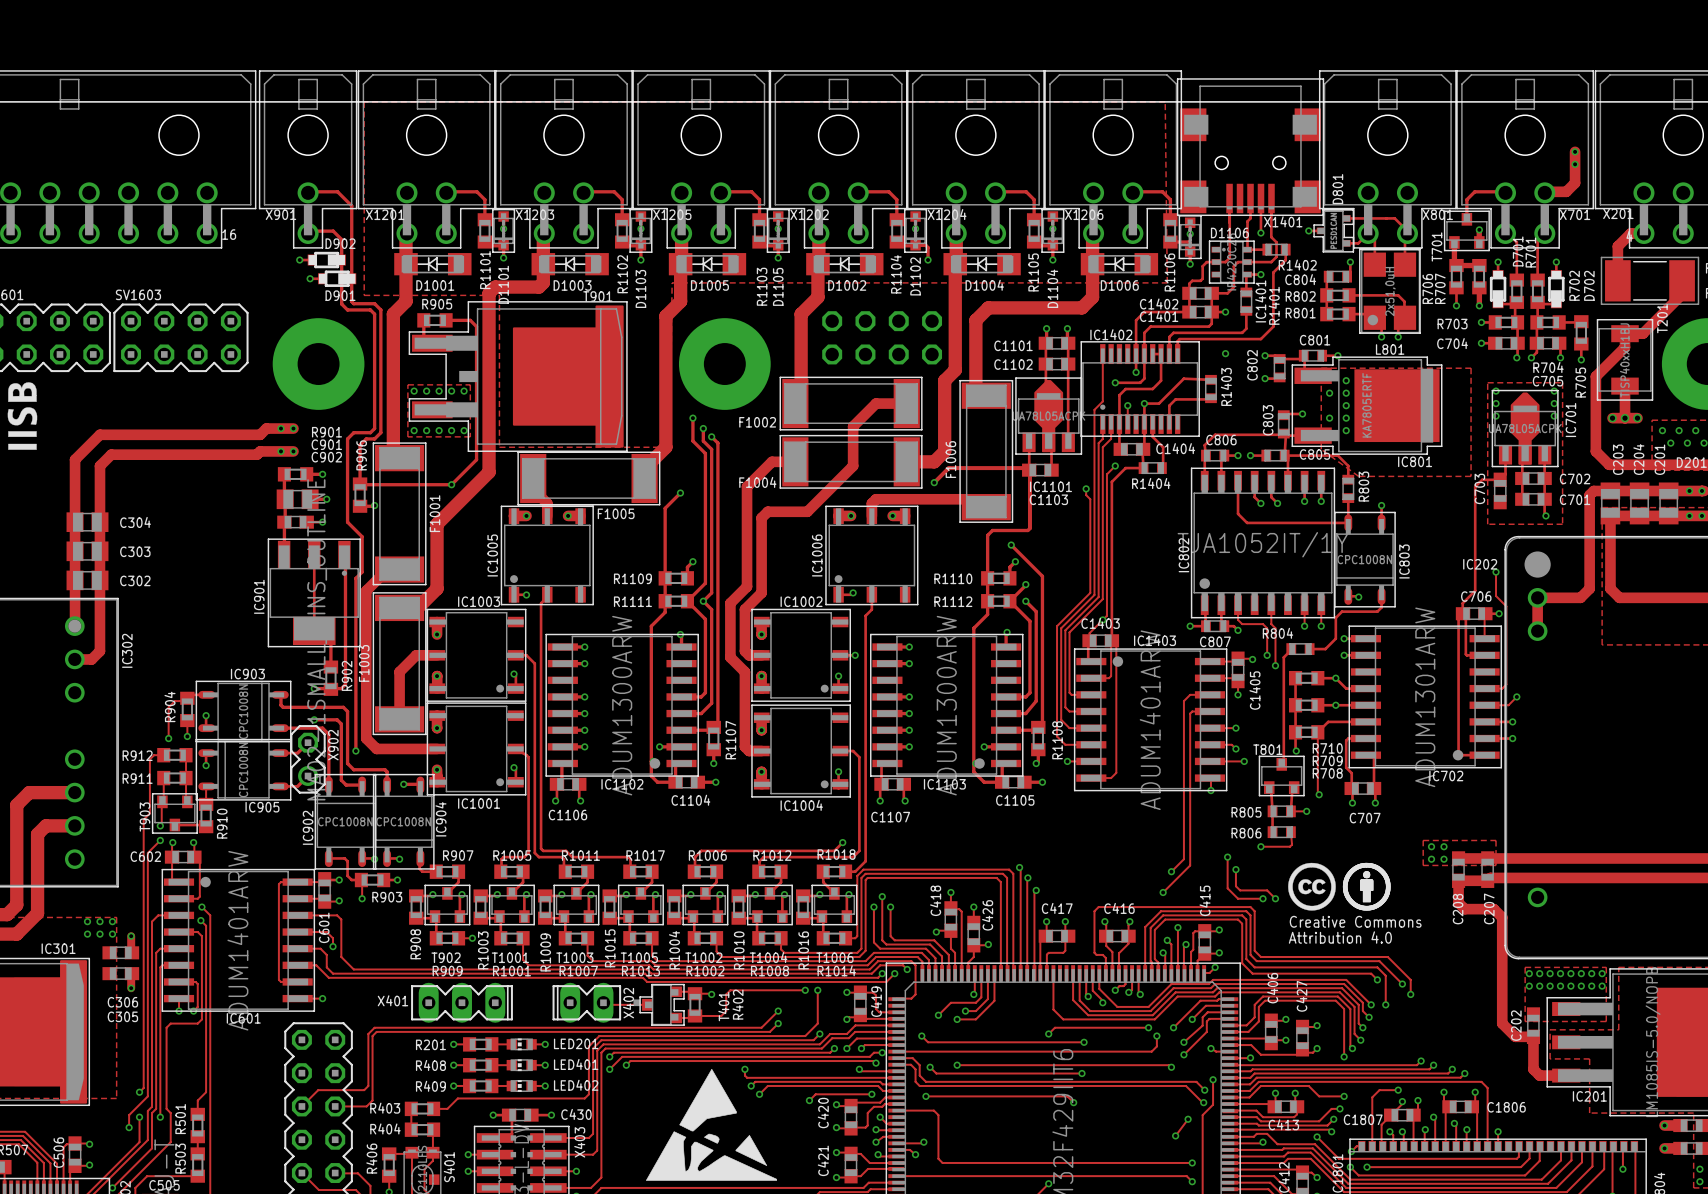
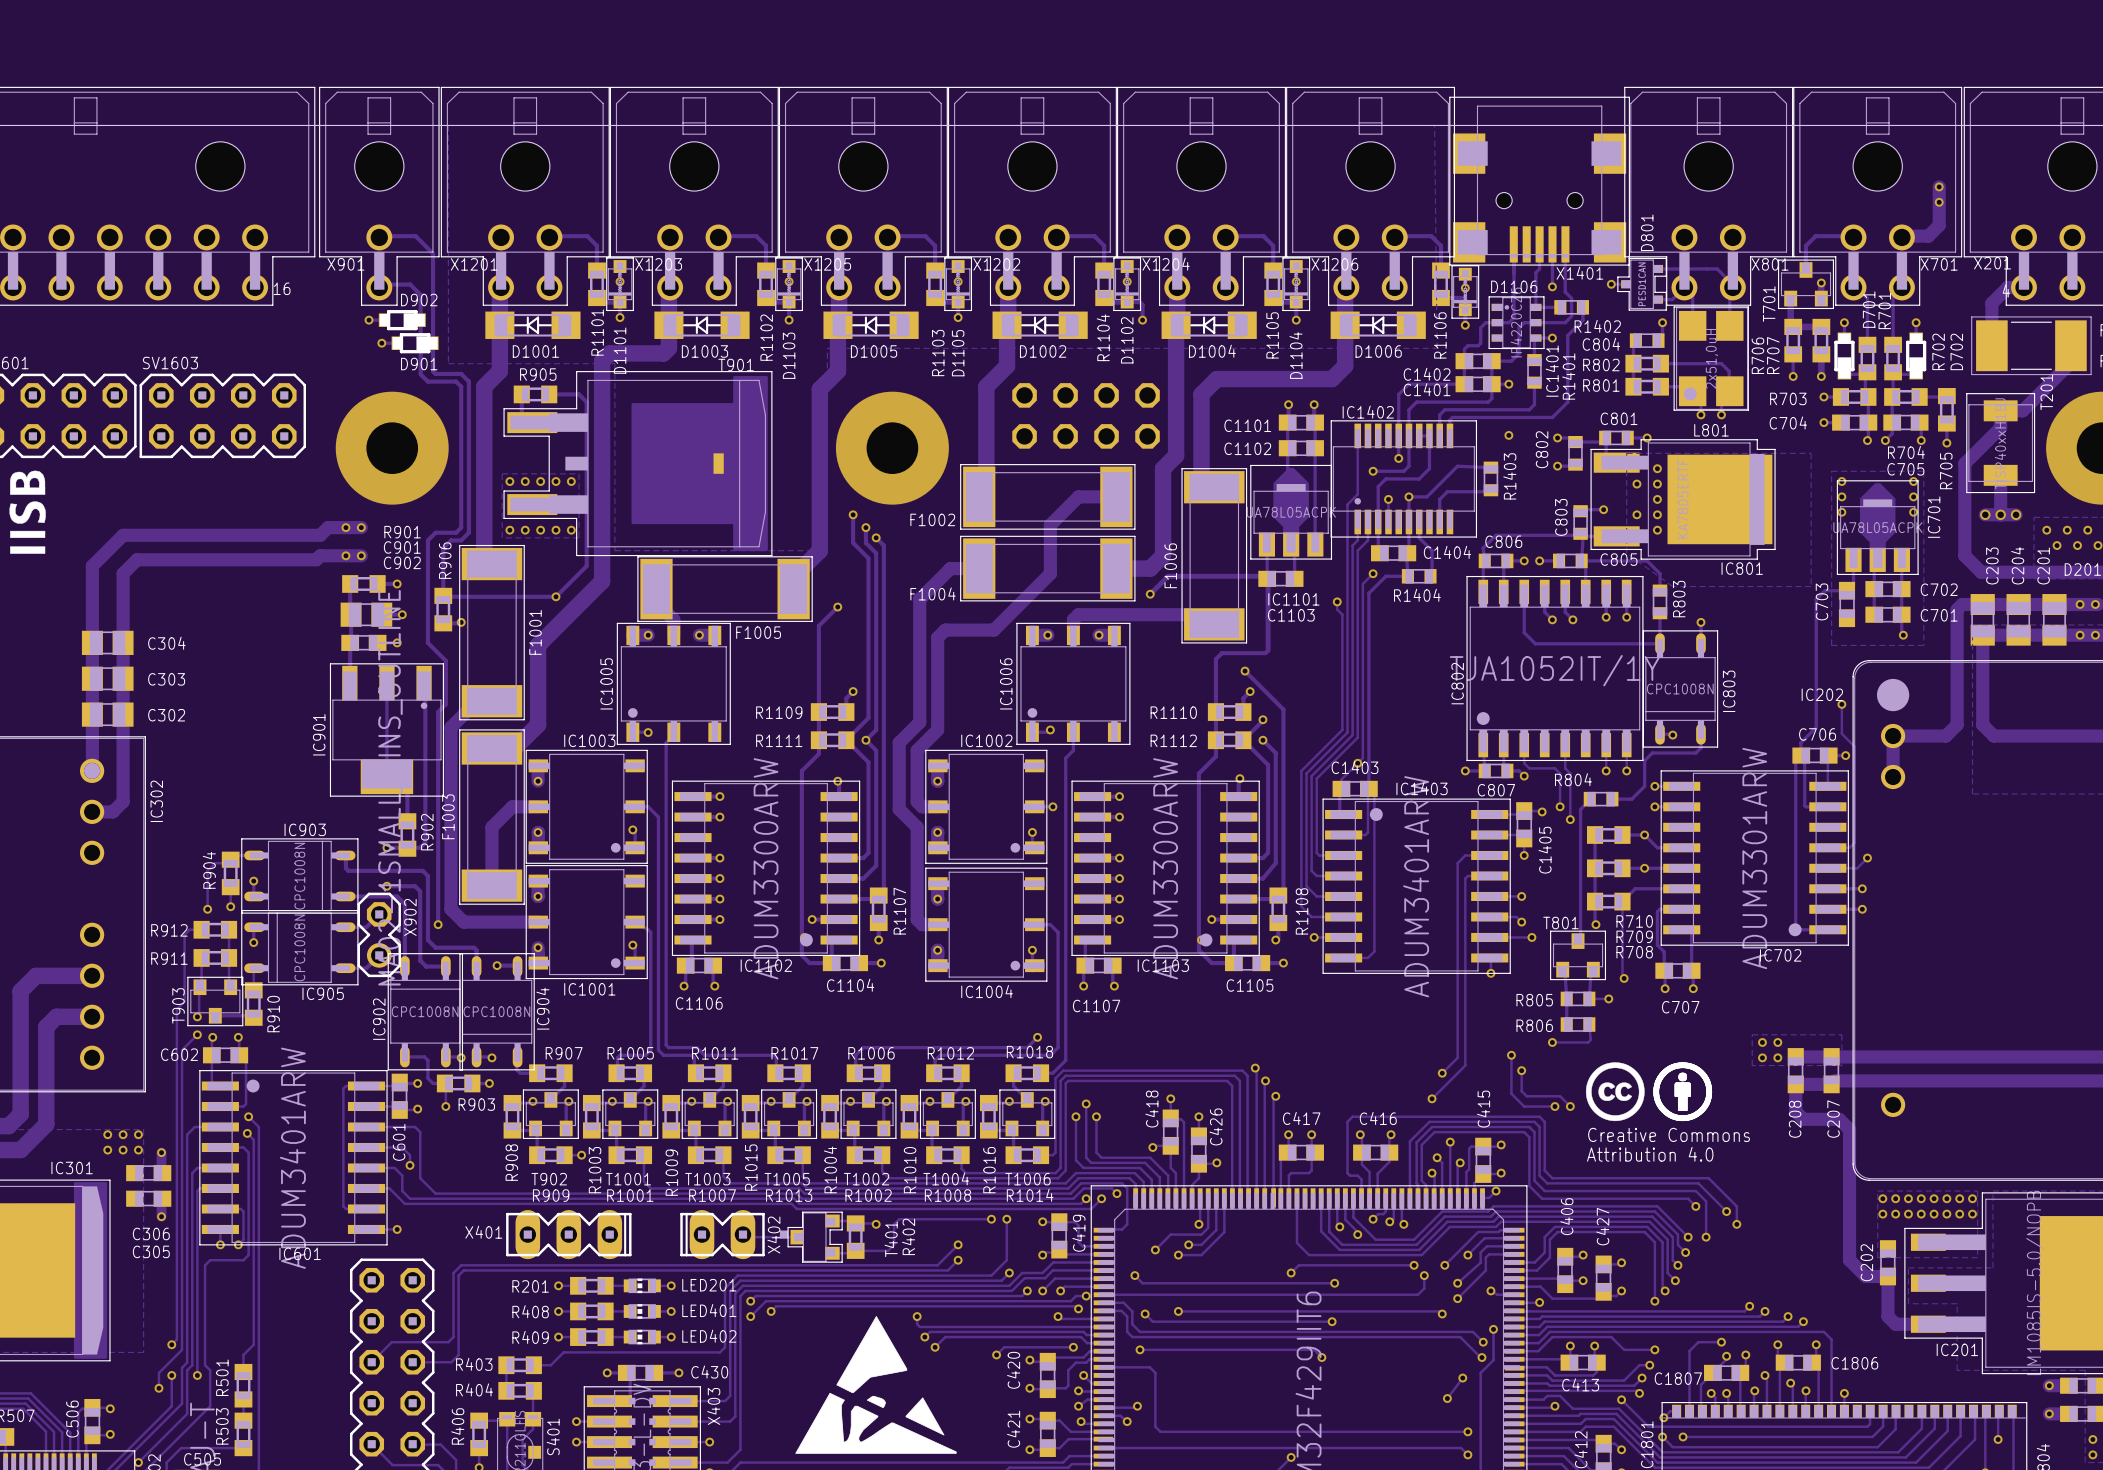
IC702 text: ADUM1301ARW (1425, 697) -> ADUM3301ARW (1754, 858)
IC1102 text: ADUM1300ARW (622, 705) -> ADUM3300ARW (766, 868)
IC1103 text: ADUM1300ARW (946, 705) -> ADUM3300ARW (1165, 868)
IC1403 text: ADUM1401ARW (1150, 720) -> ADUM3401ARW (1416, 886)
IC601 text: ADUM1401ARW (237, 940) -> ADUM3401ARW (292, 1158)

